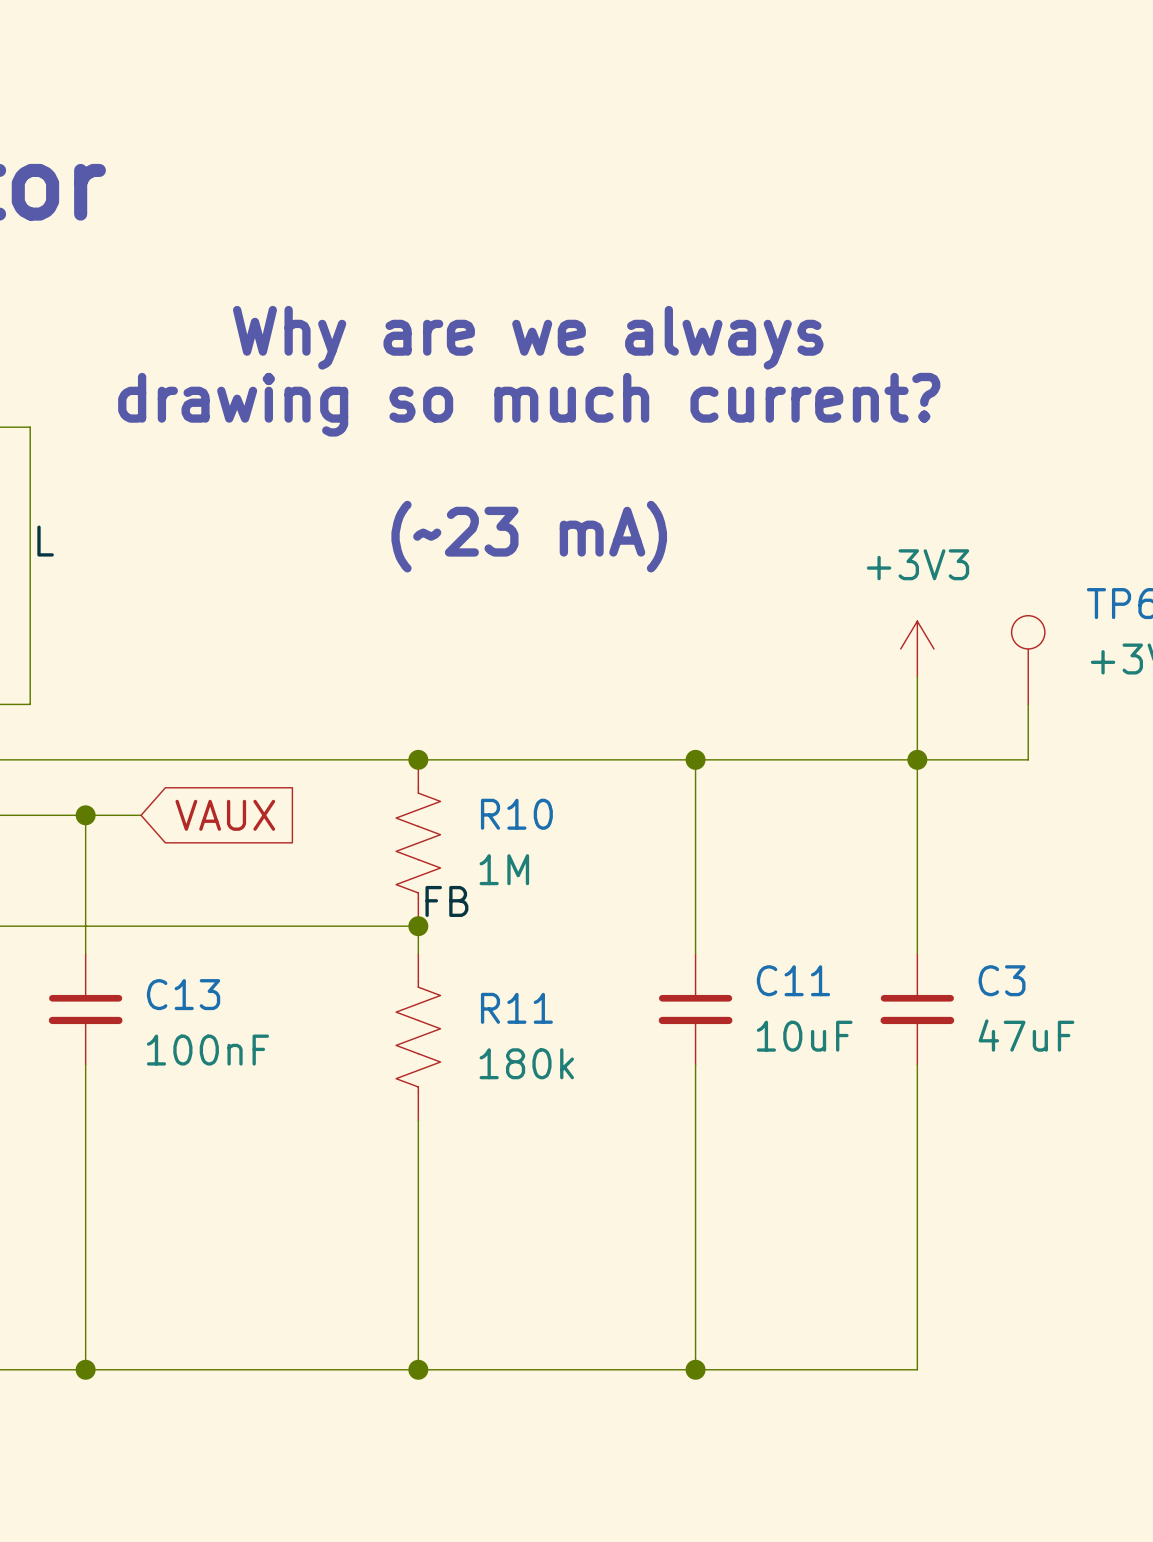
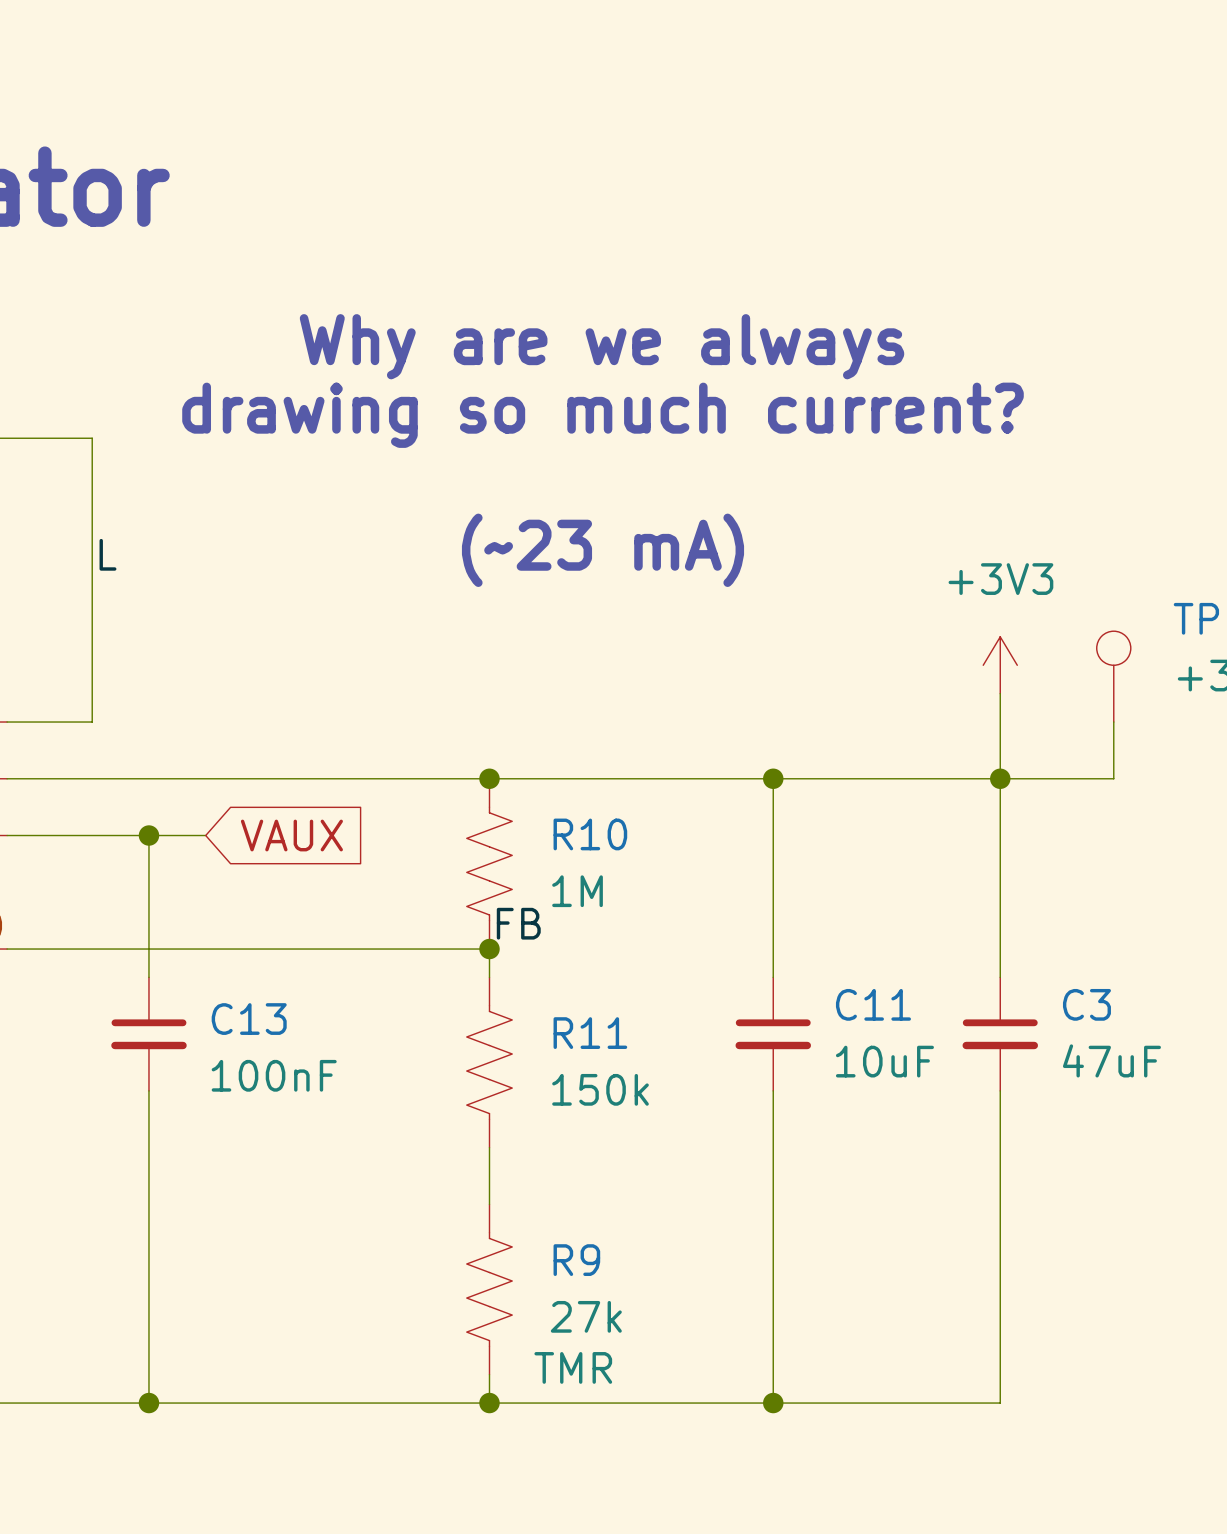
R11 value: 180k (526, 1063) -> 150k (600, 1089)
wire: (418, 1175) (418, 1342) -> none
R9: none -> 27k (489, 1289)

